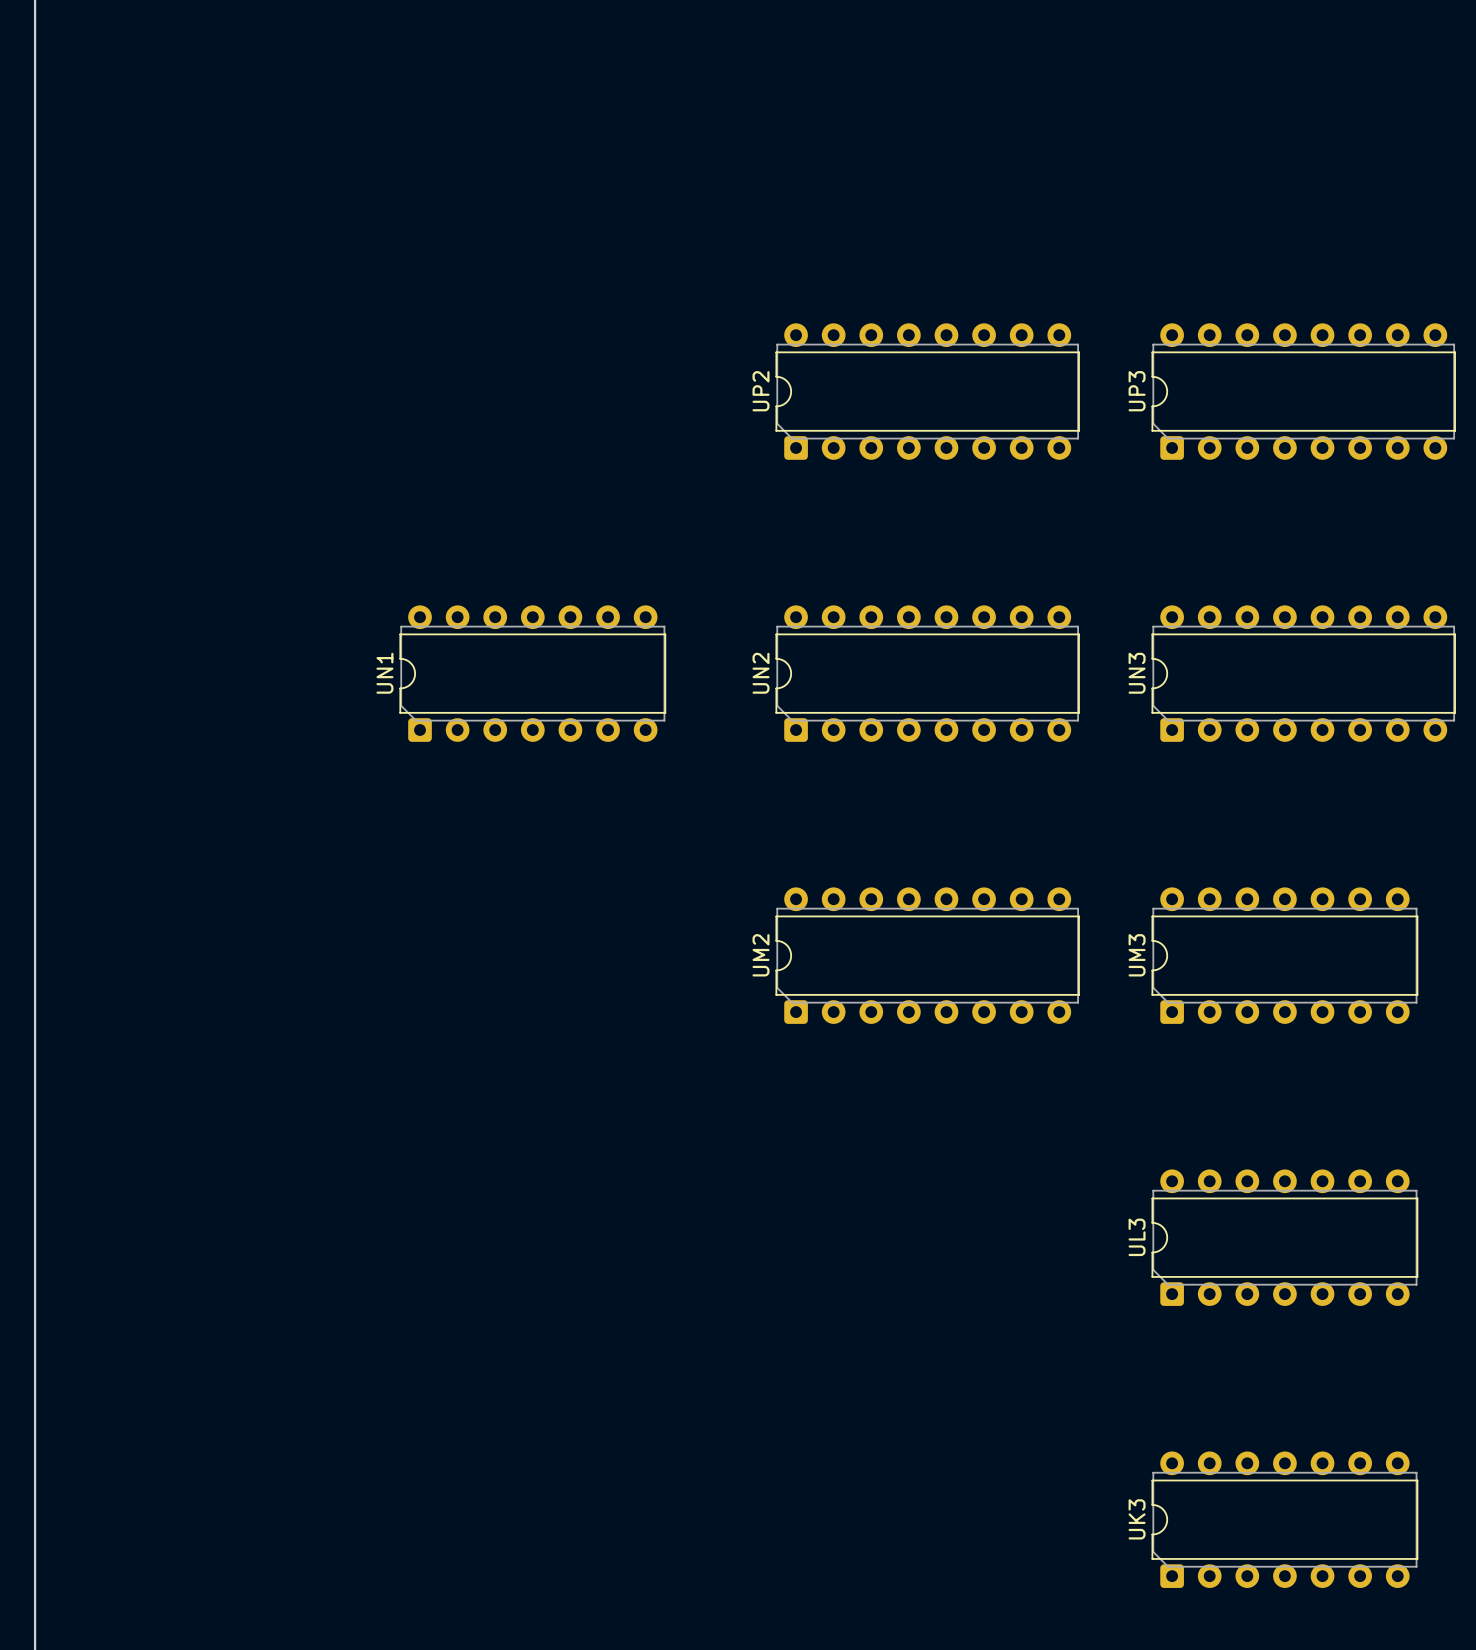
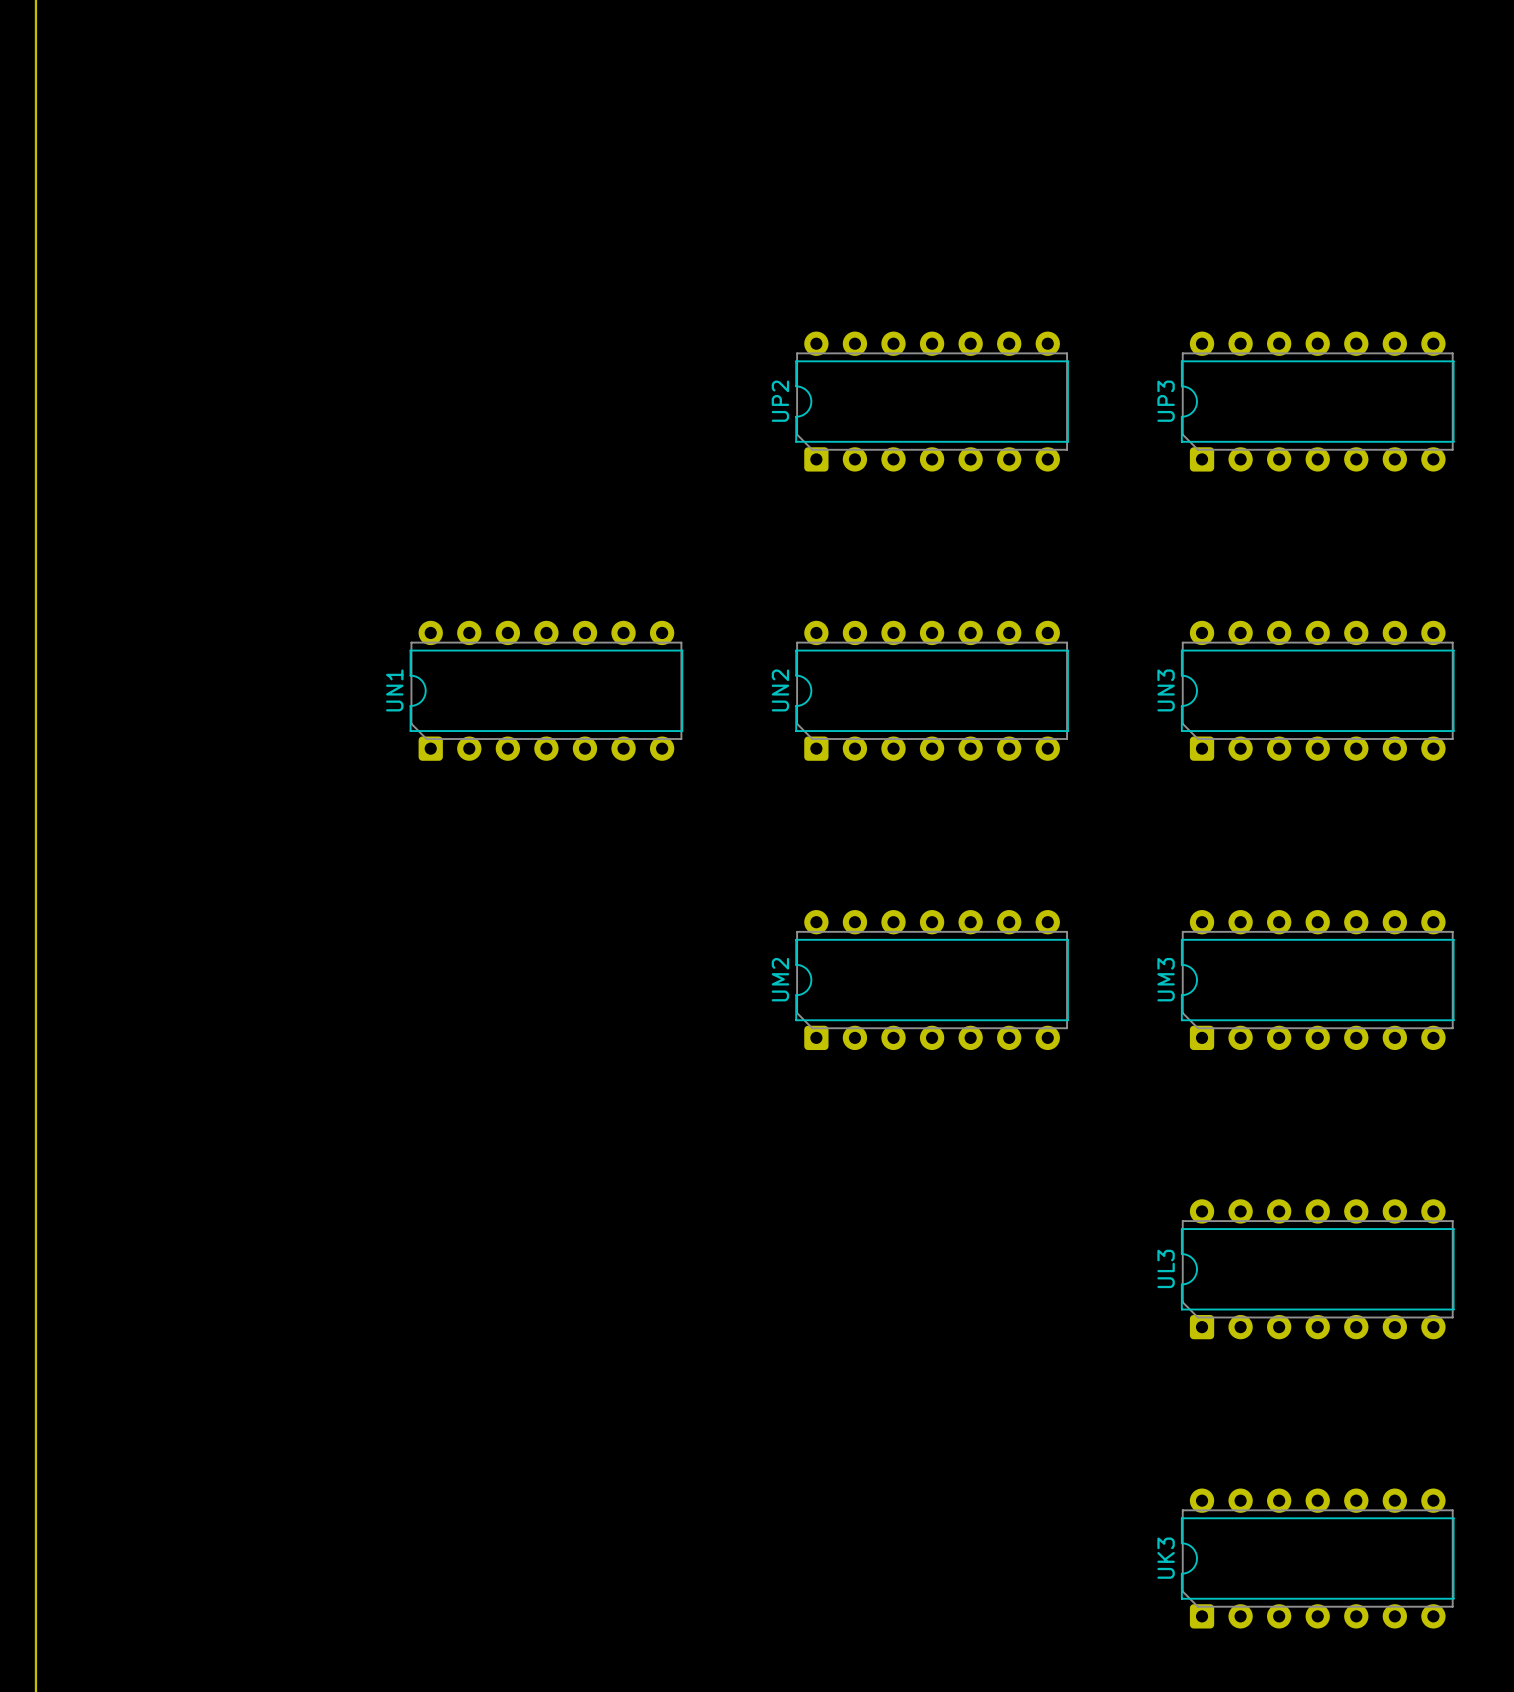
UP2 footprint: [775, 323, 1080, 460] -> [795, 331, 1069, 472]
UP3 footprint: [1151, 323, 1456, 460] -> [1180, 331, 1455, 472]
UN2 footprint: [775, 605, 1080, 742] -> [795, 620, 1069, 761]
UN3 footprint: [1151, 605, 1456, 742] -> [1180, 620, 1455, 761]
UM2 footprint: [775, 887, 1080, 1024] -> [795, 910, 1069, 1051]

